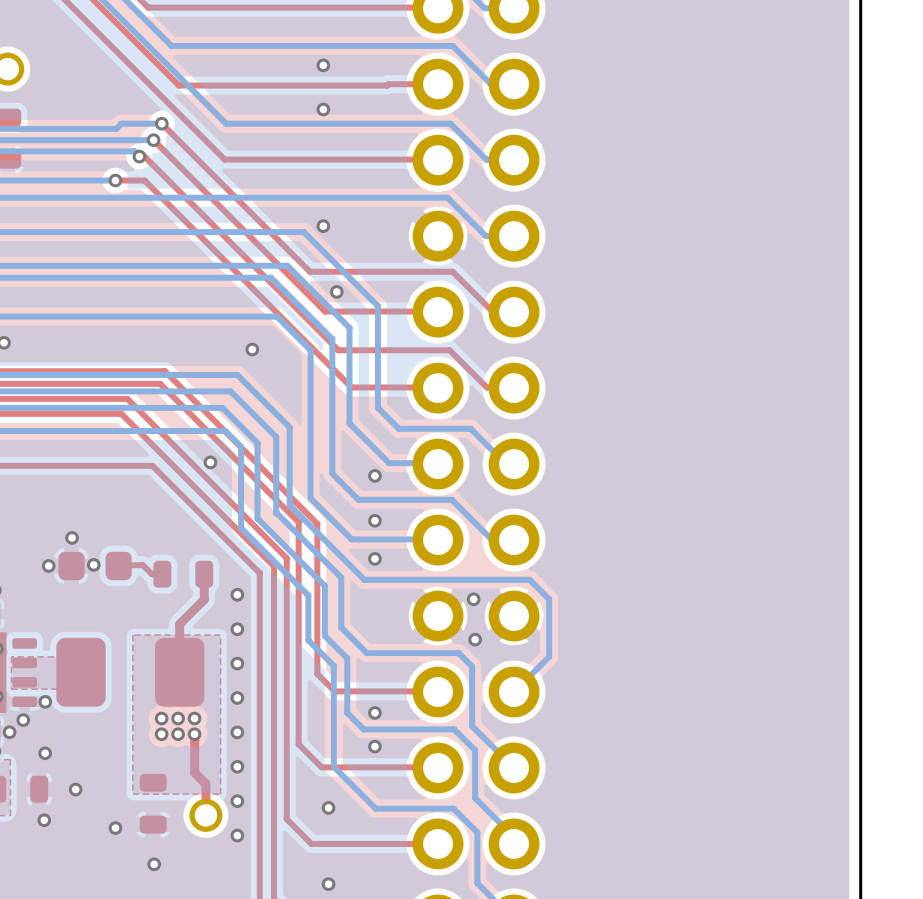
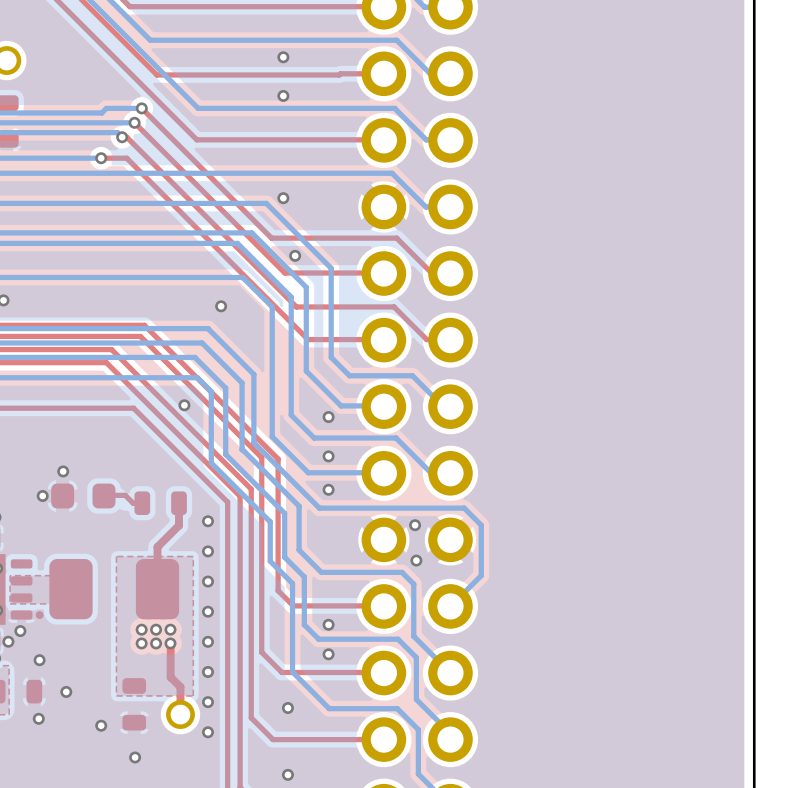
via: (93, 564) -> none
via: (45, 701) -> none

